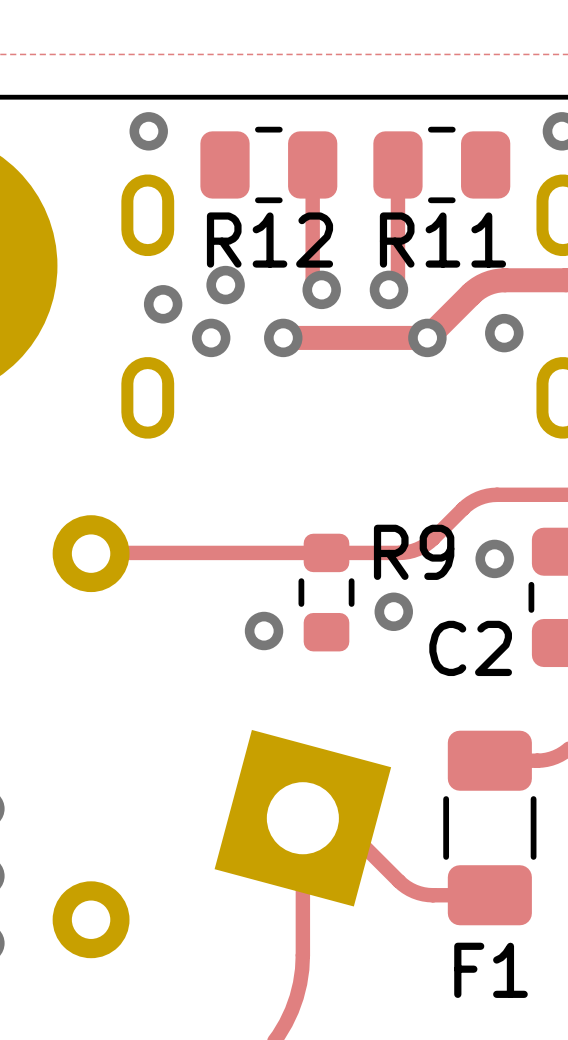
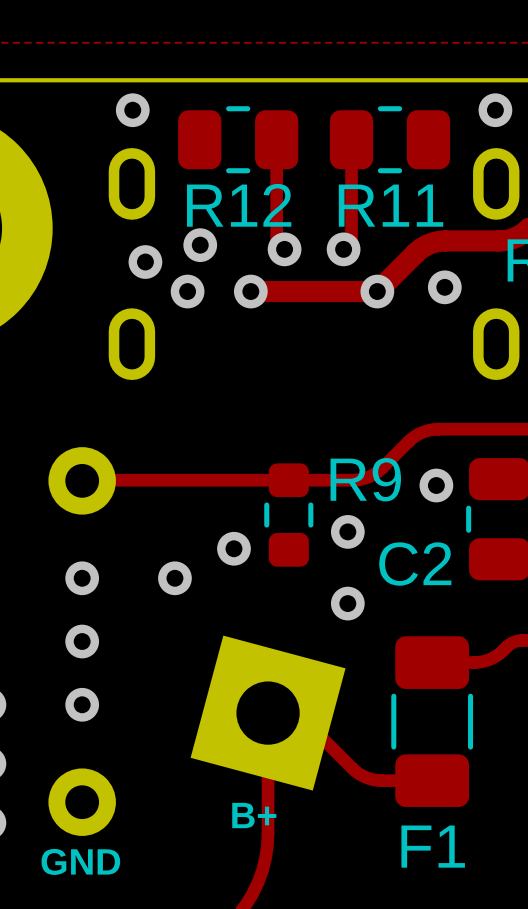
via: none -> (82, 578)
via: none -> (174, 578)
via: none -> (347, 603)
via: none -> (82, 641)
via: none -> (82, 704)
text: none -> B+ (254, 815)
text: none -> GND (80, 861)

